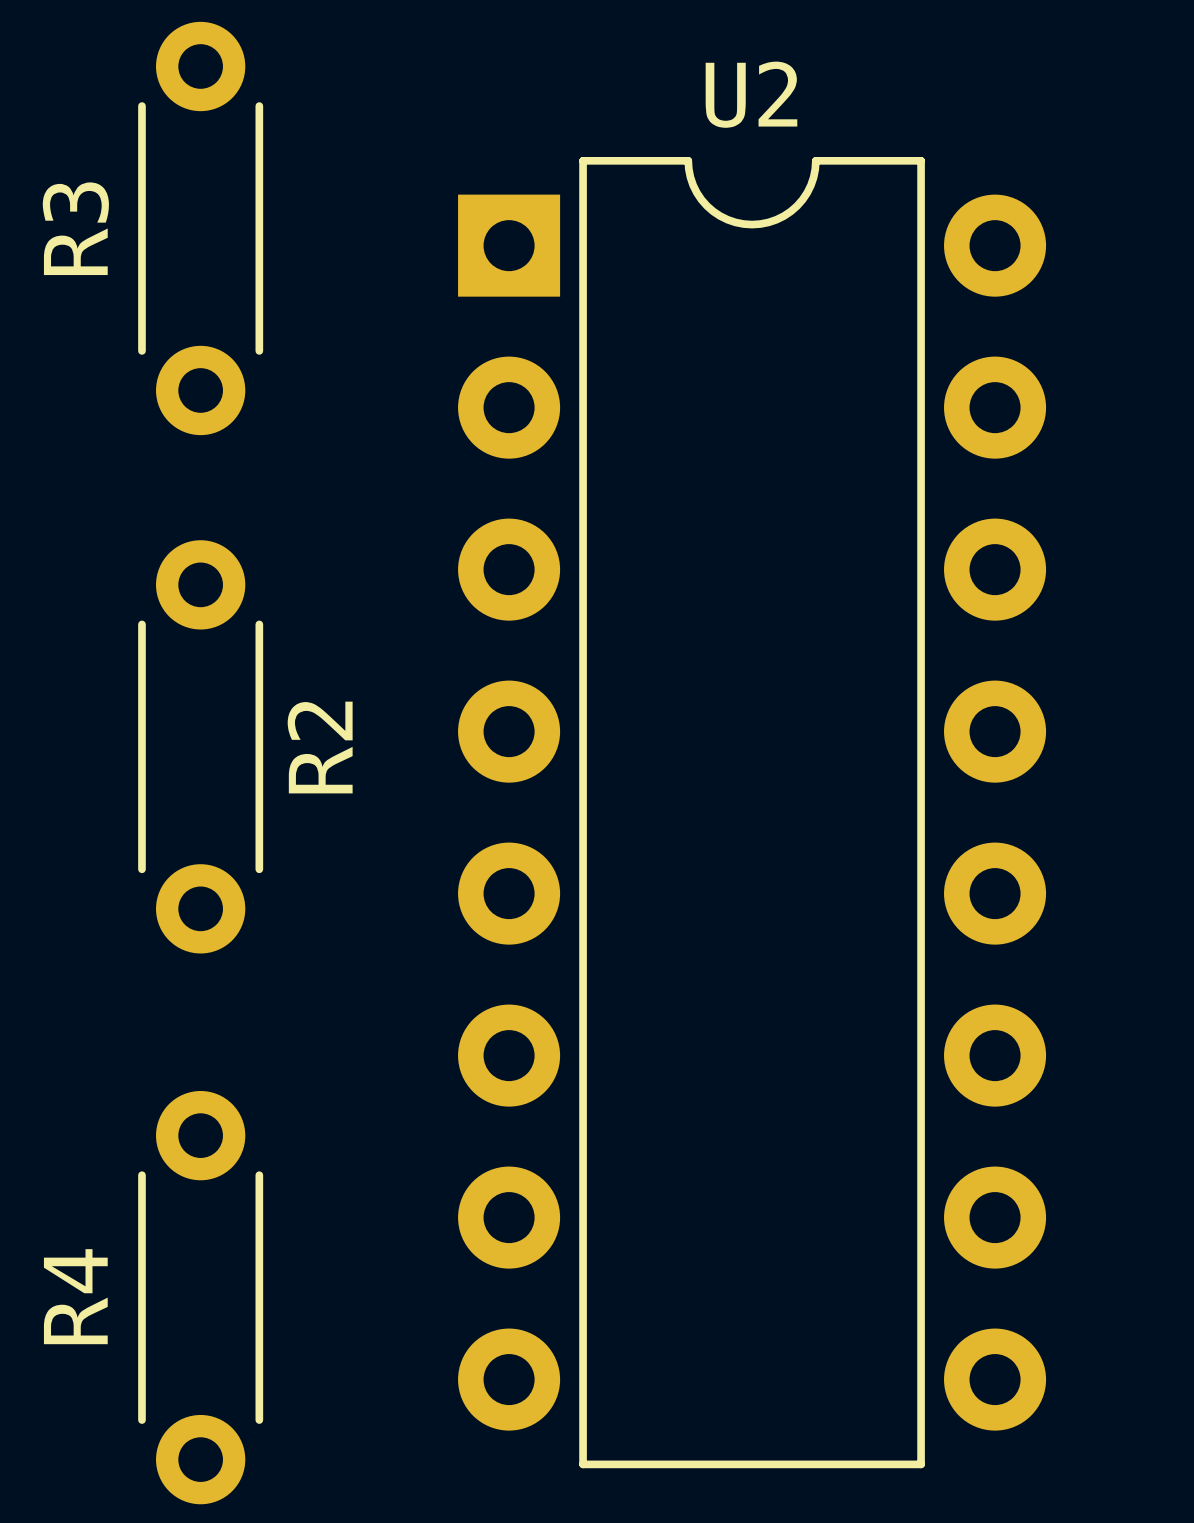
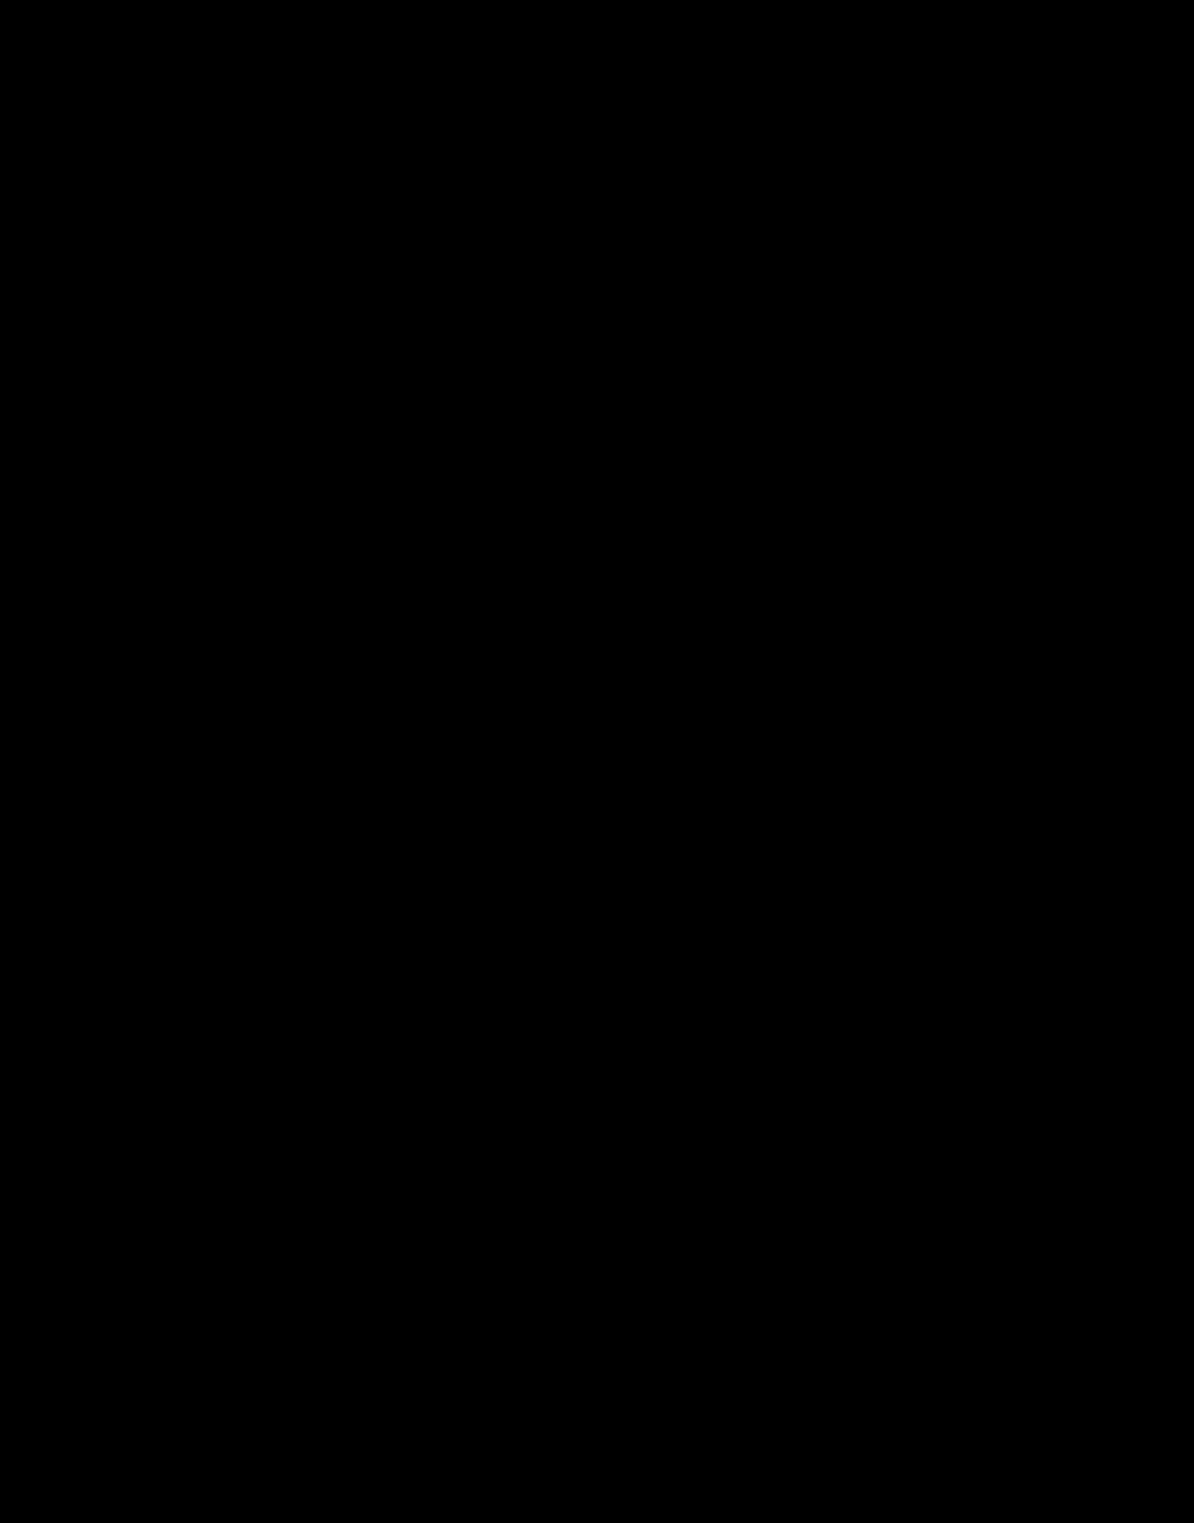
R3: (200, 228) -> none
R2: (200, 746) -> none
U2: (752, 812) -> none
R4: (200, 1297) -> none

